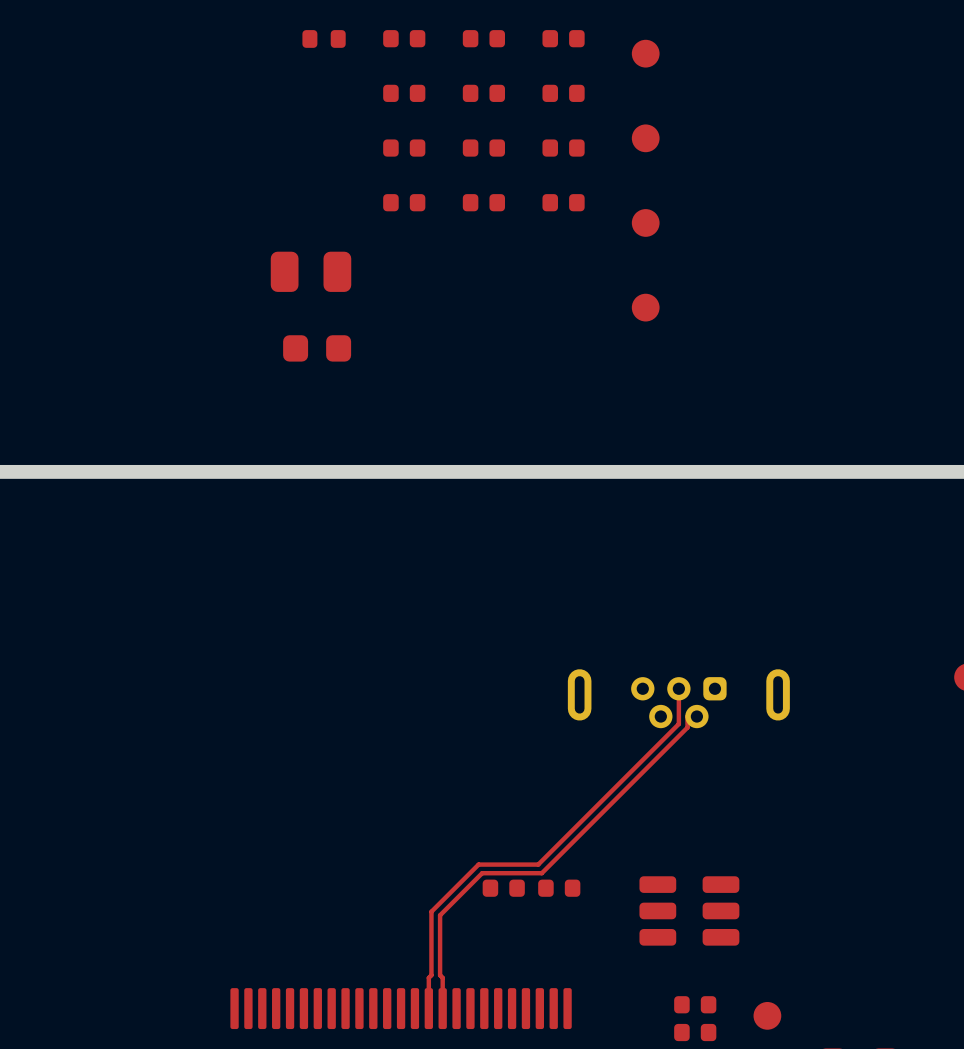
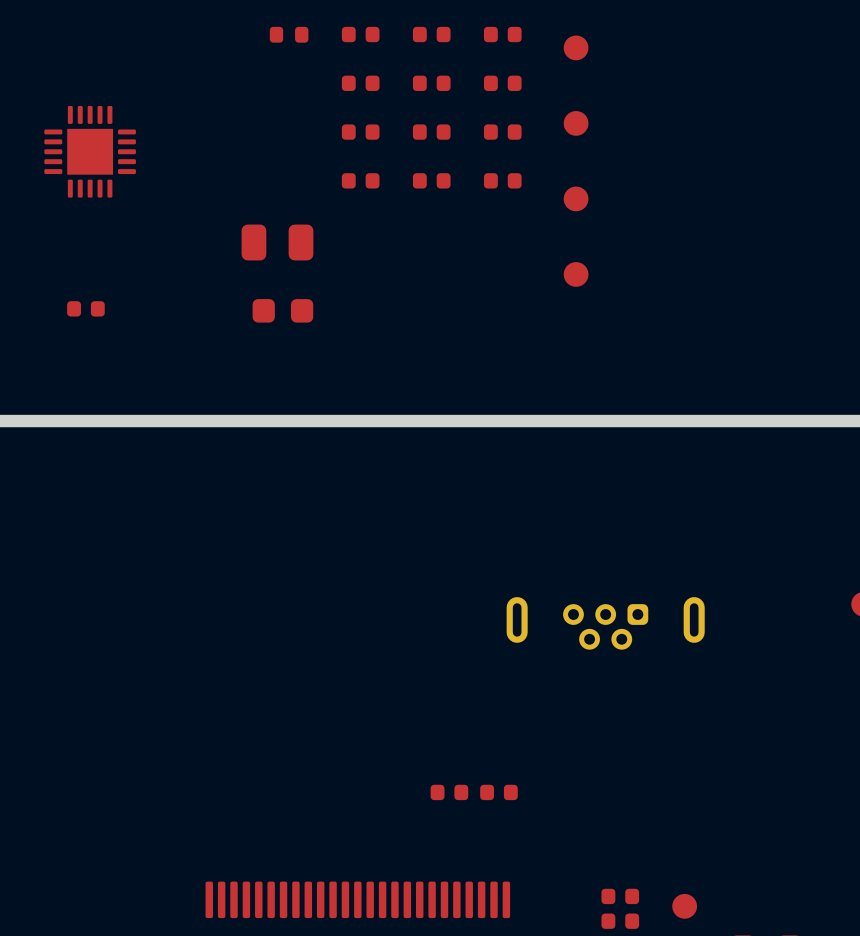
part: none -> (90, 151)
part: none -> (85, 308)
top track: (678, 688) (678, 723) (538, 864) (478, 864) (431, 911) (431, 975) (428, 977) (428, 1008) -> none
top track: (696, 716) (687, 716) (687, 727) (541, 873) (482, 873) (440, 915) (440, 975) (442, 977) (442, 1008) -> none
part: (689, 910) -> none

